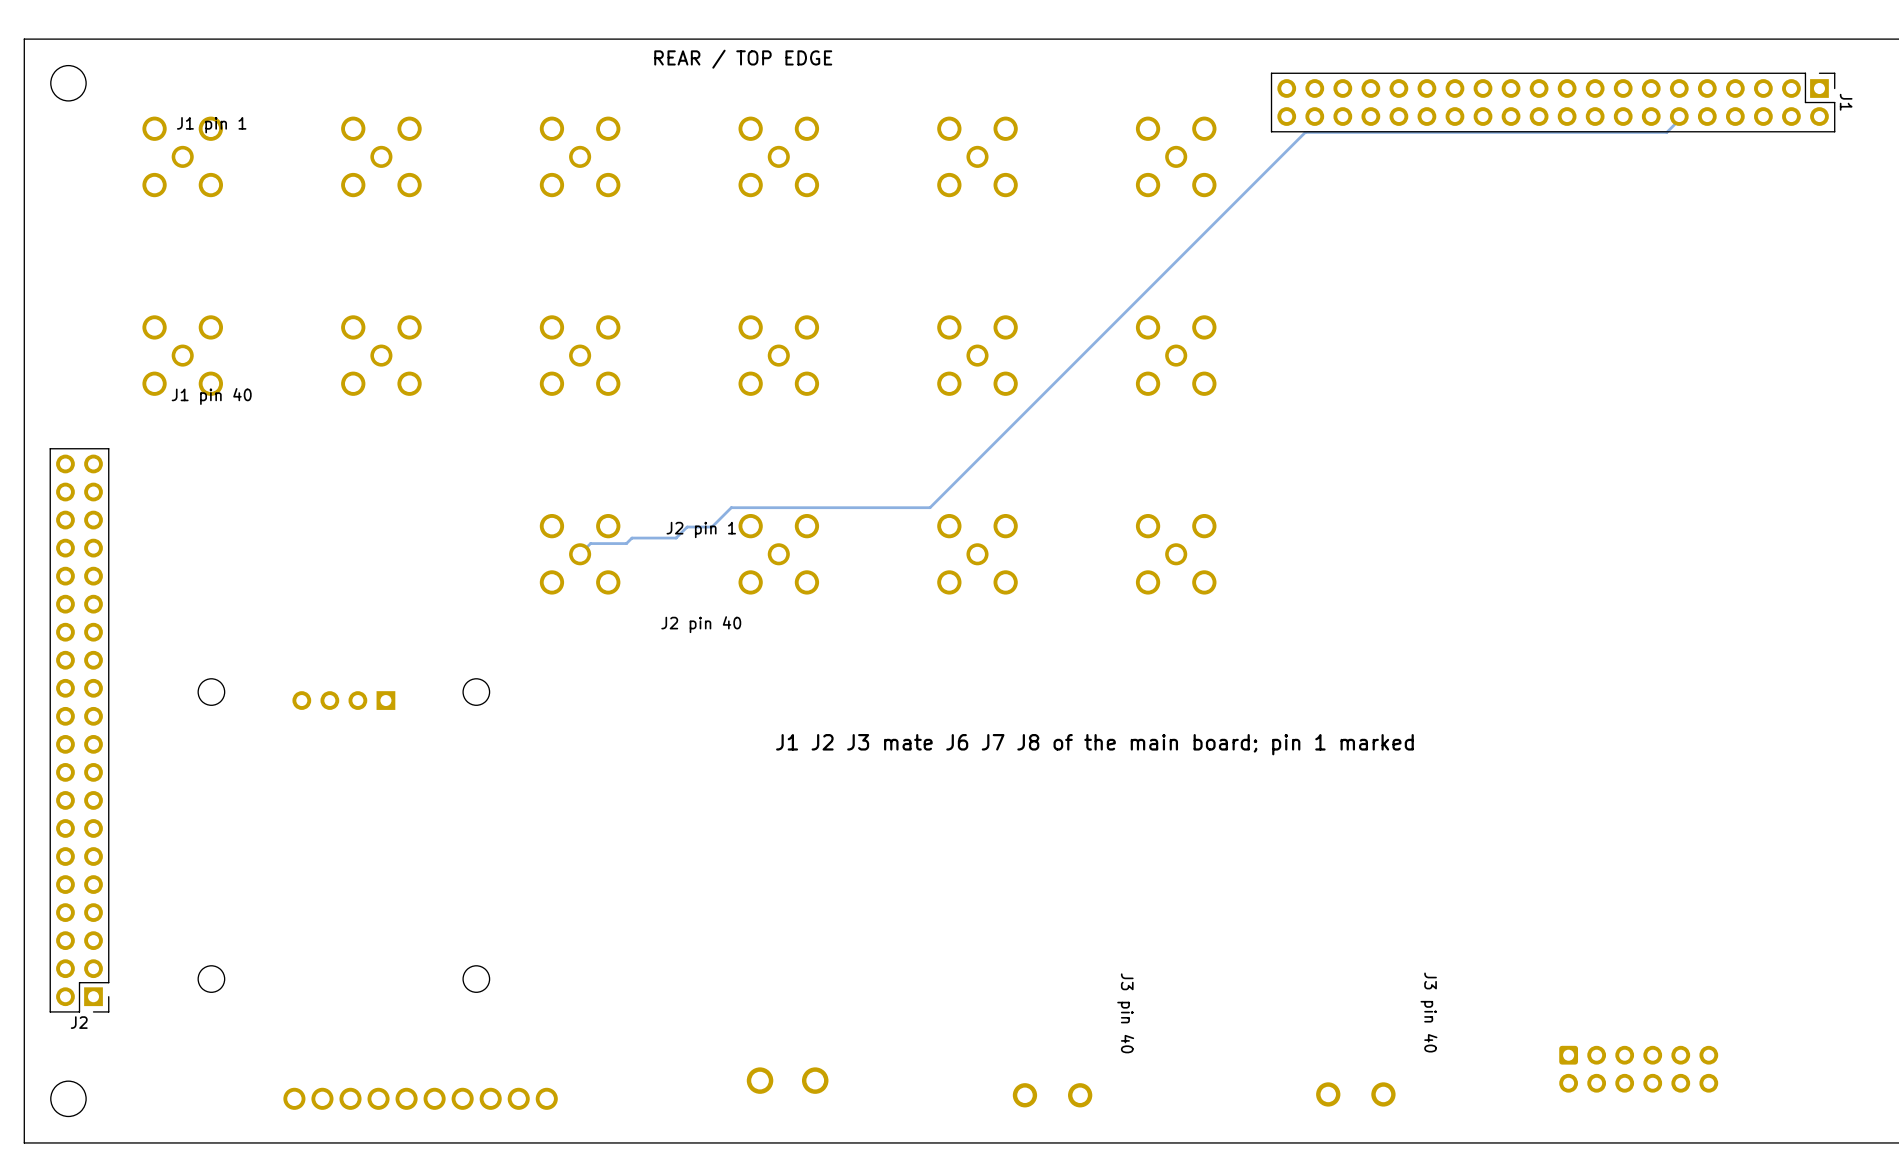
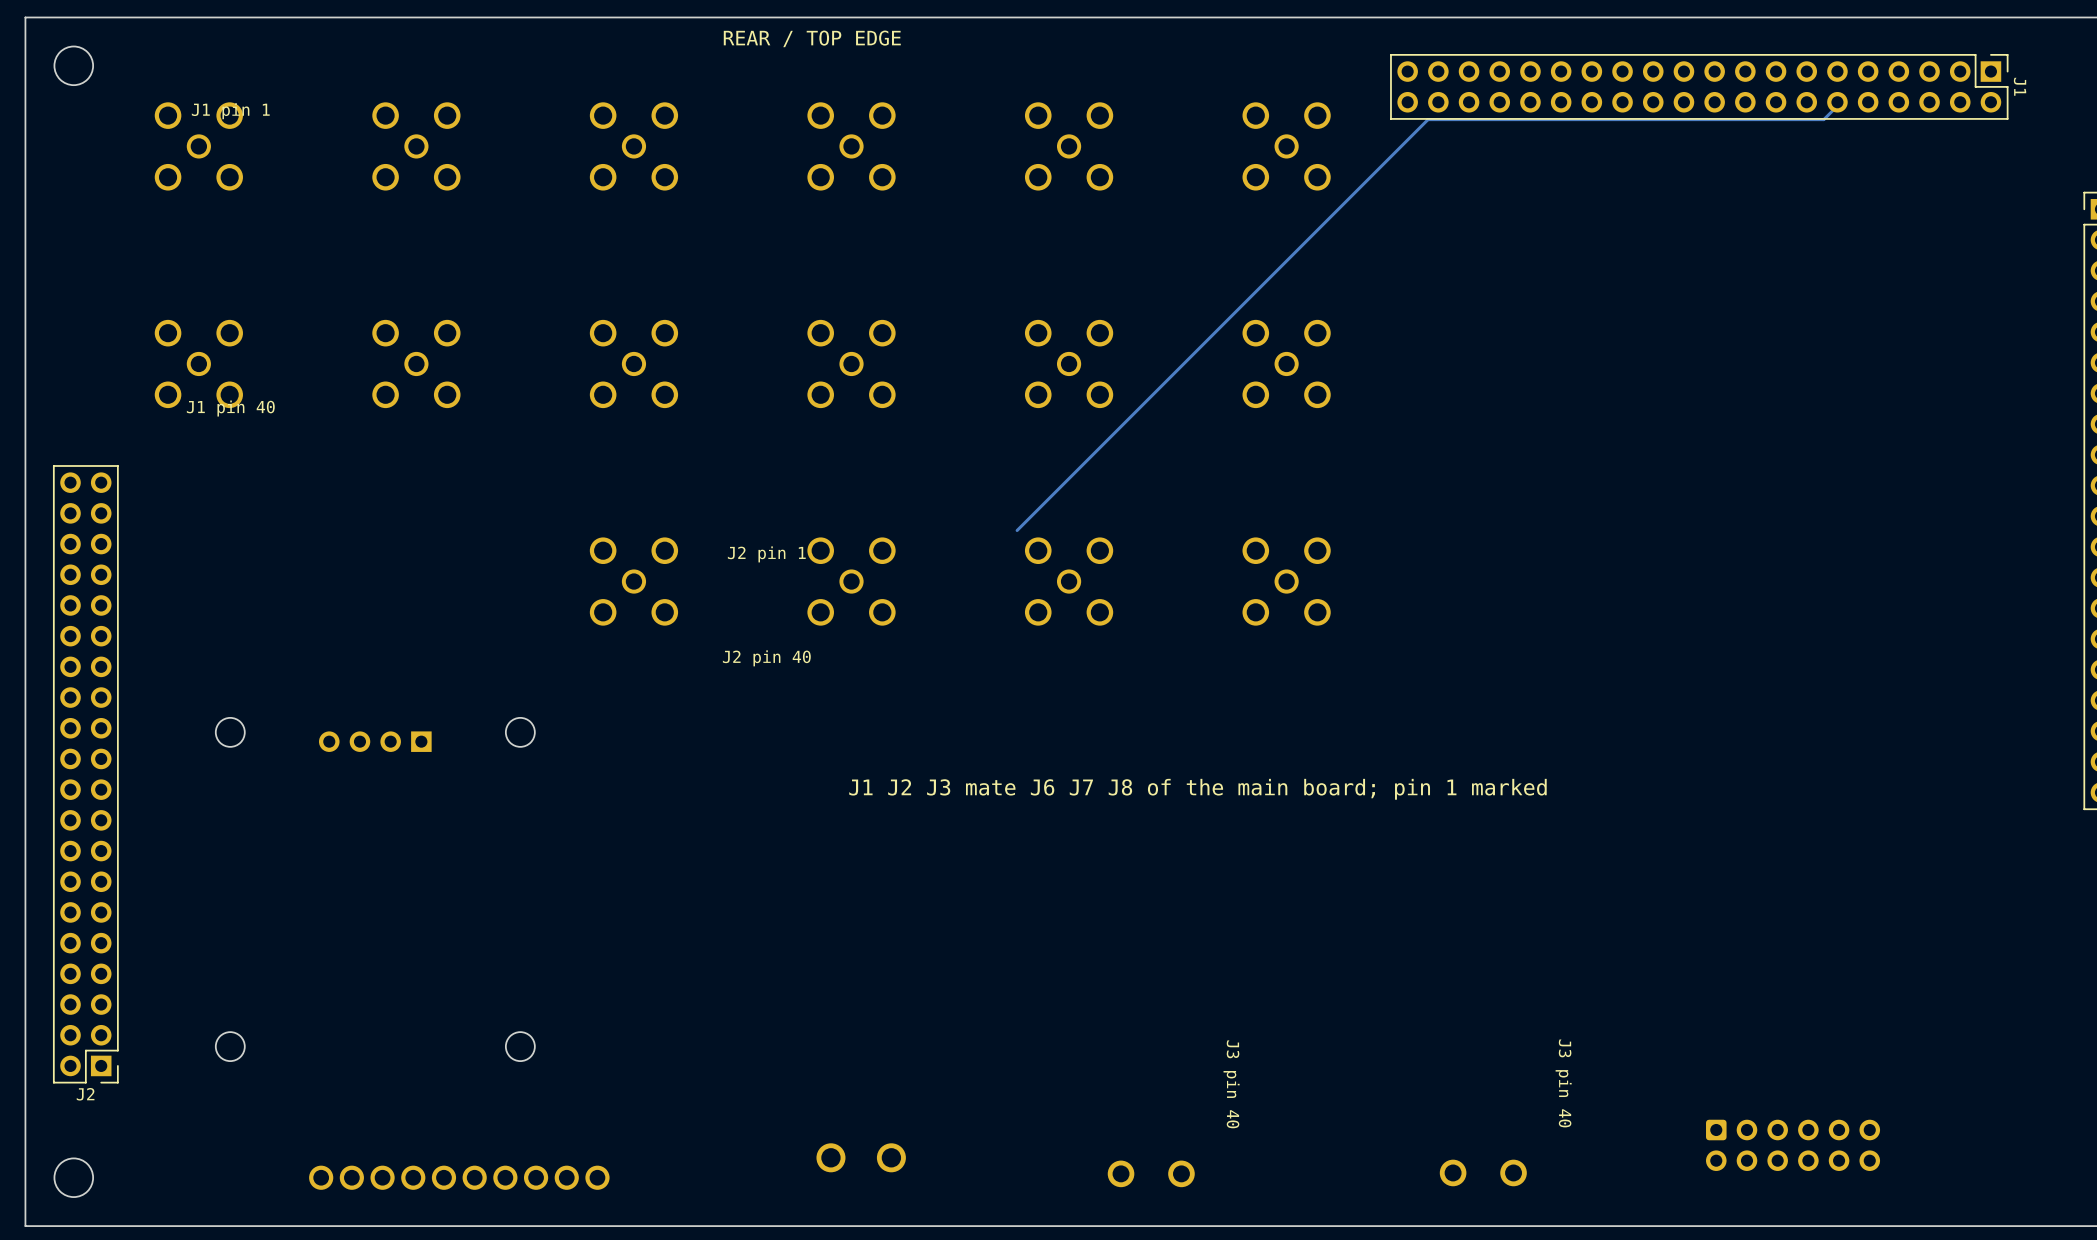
track: (930, 507) (731, 507) (712, 527) (687, 527) (676, 538) (631, 538) (626, 543) (590, 543) (580, 554) -> none

